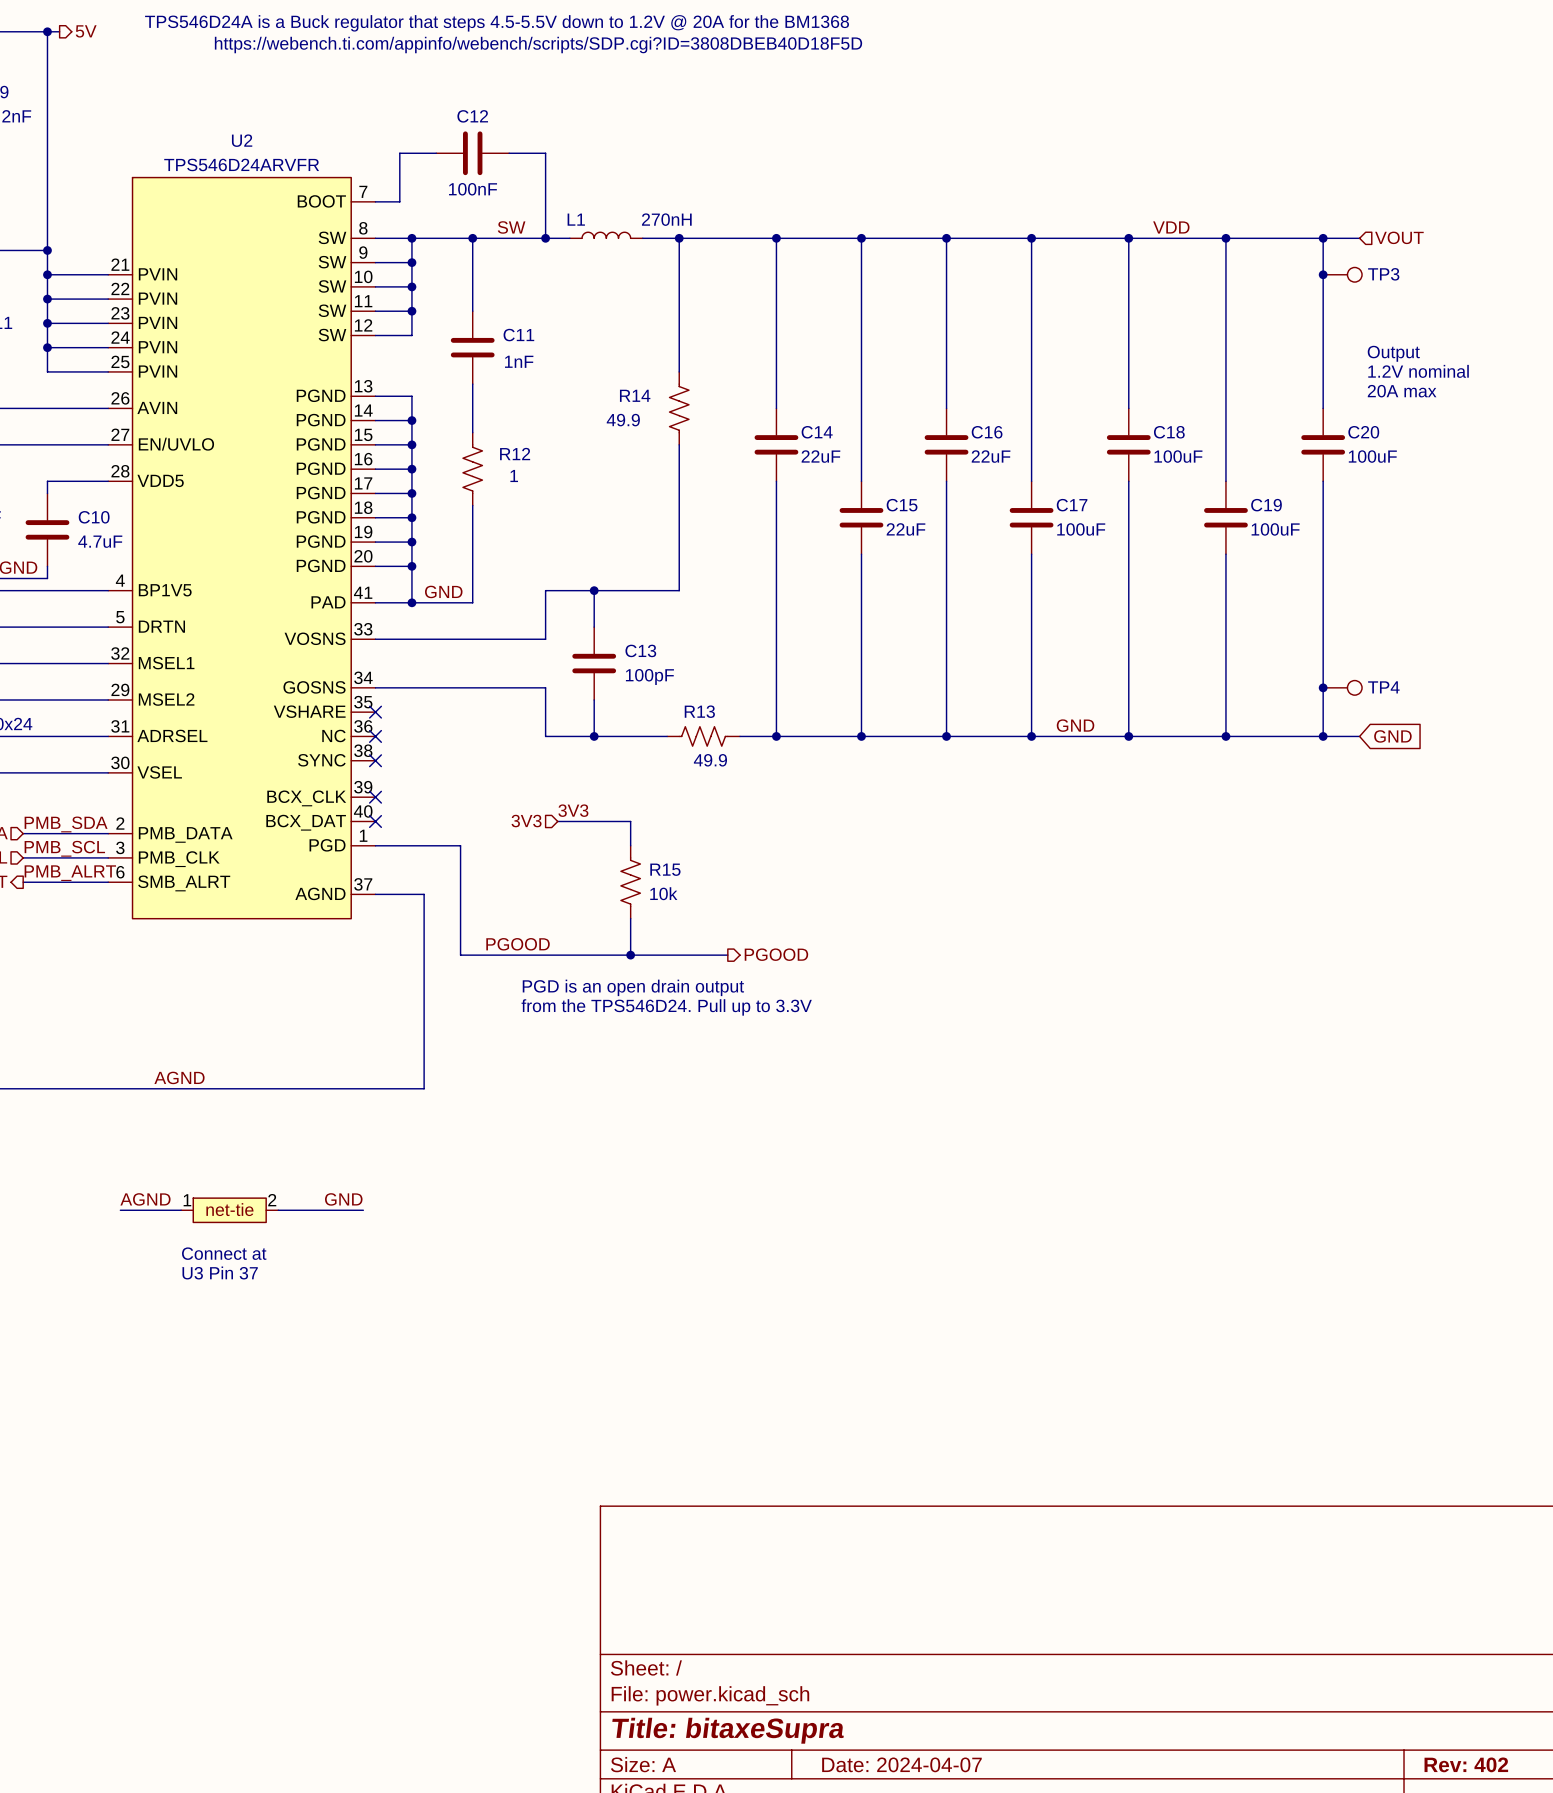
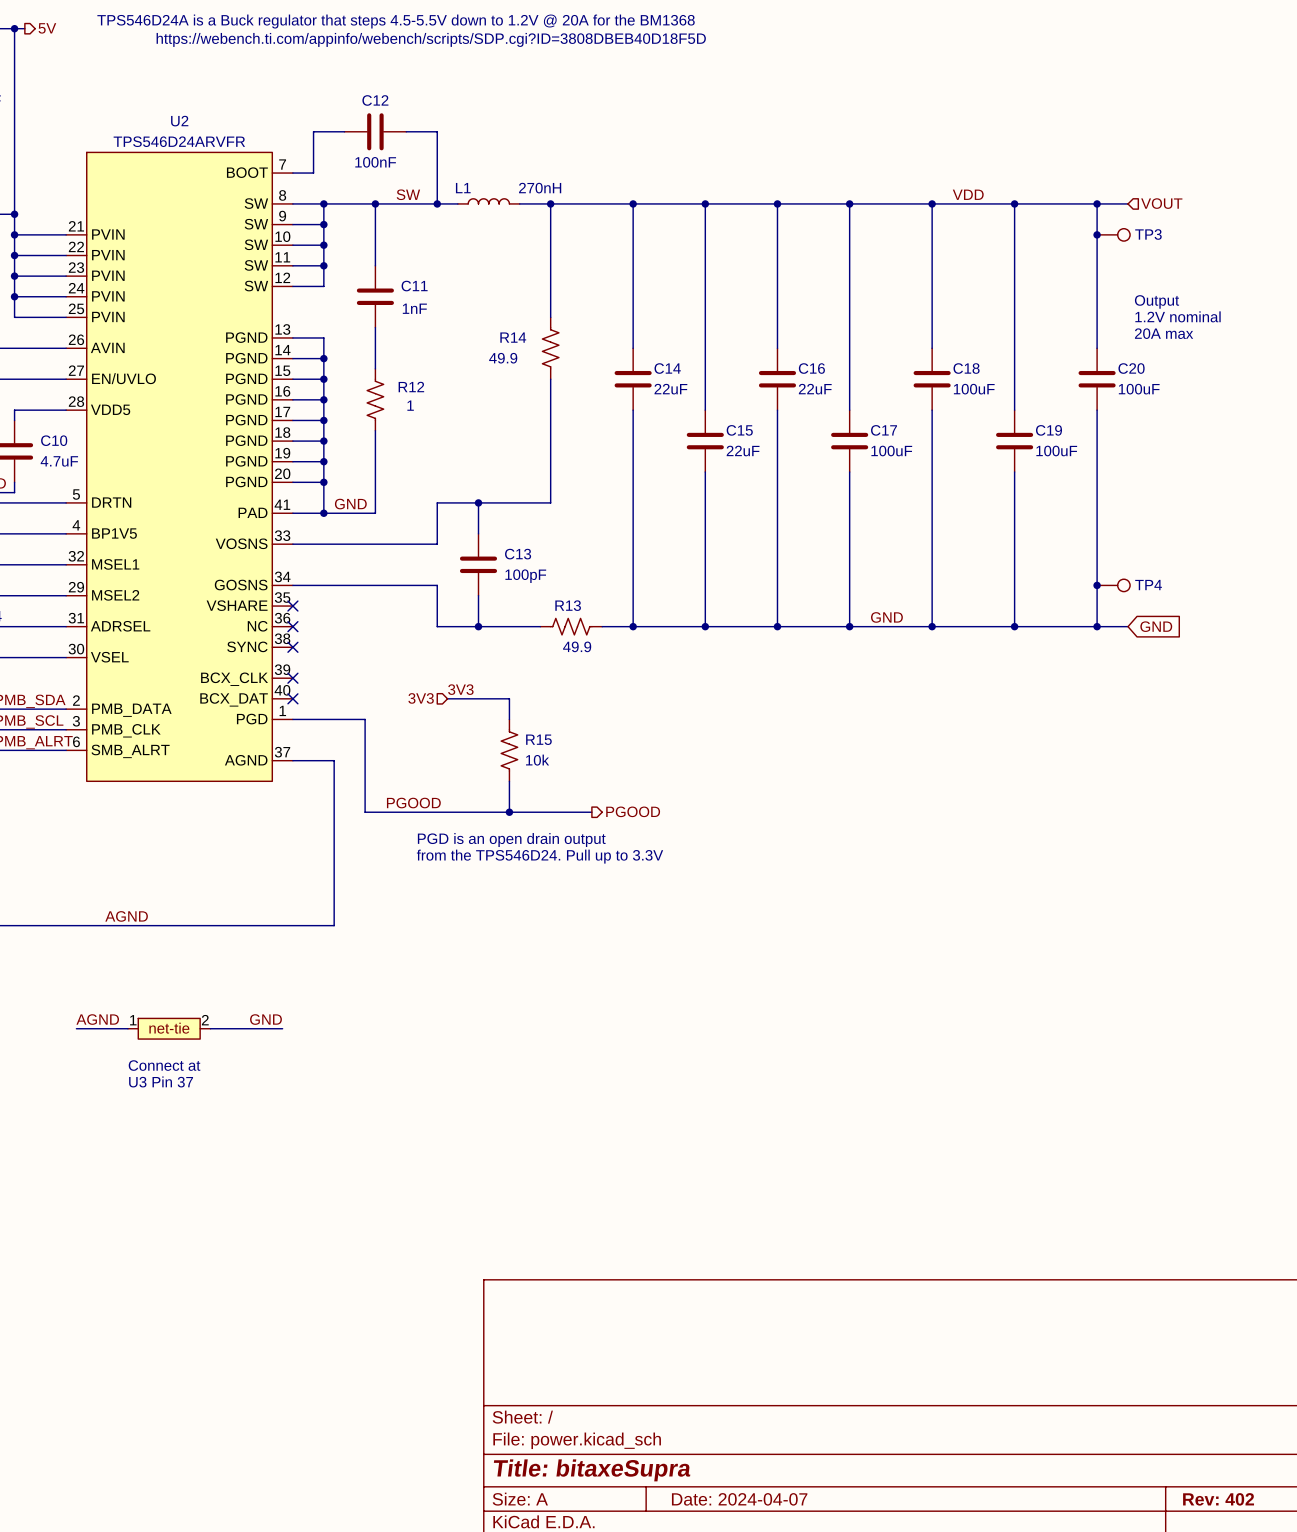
U2 pin number: 4 (120, 580) -> 5 (76, 494)
U2 pin name: BP1V5 (165, 590) -> DRTN (111, 502)
U2 pin number: 5 (120, 617) -> 4 (76, 525)
U2 pin name: DRTN (161, 626) -> BP1V5 (114, 533)

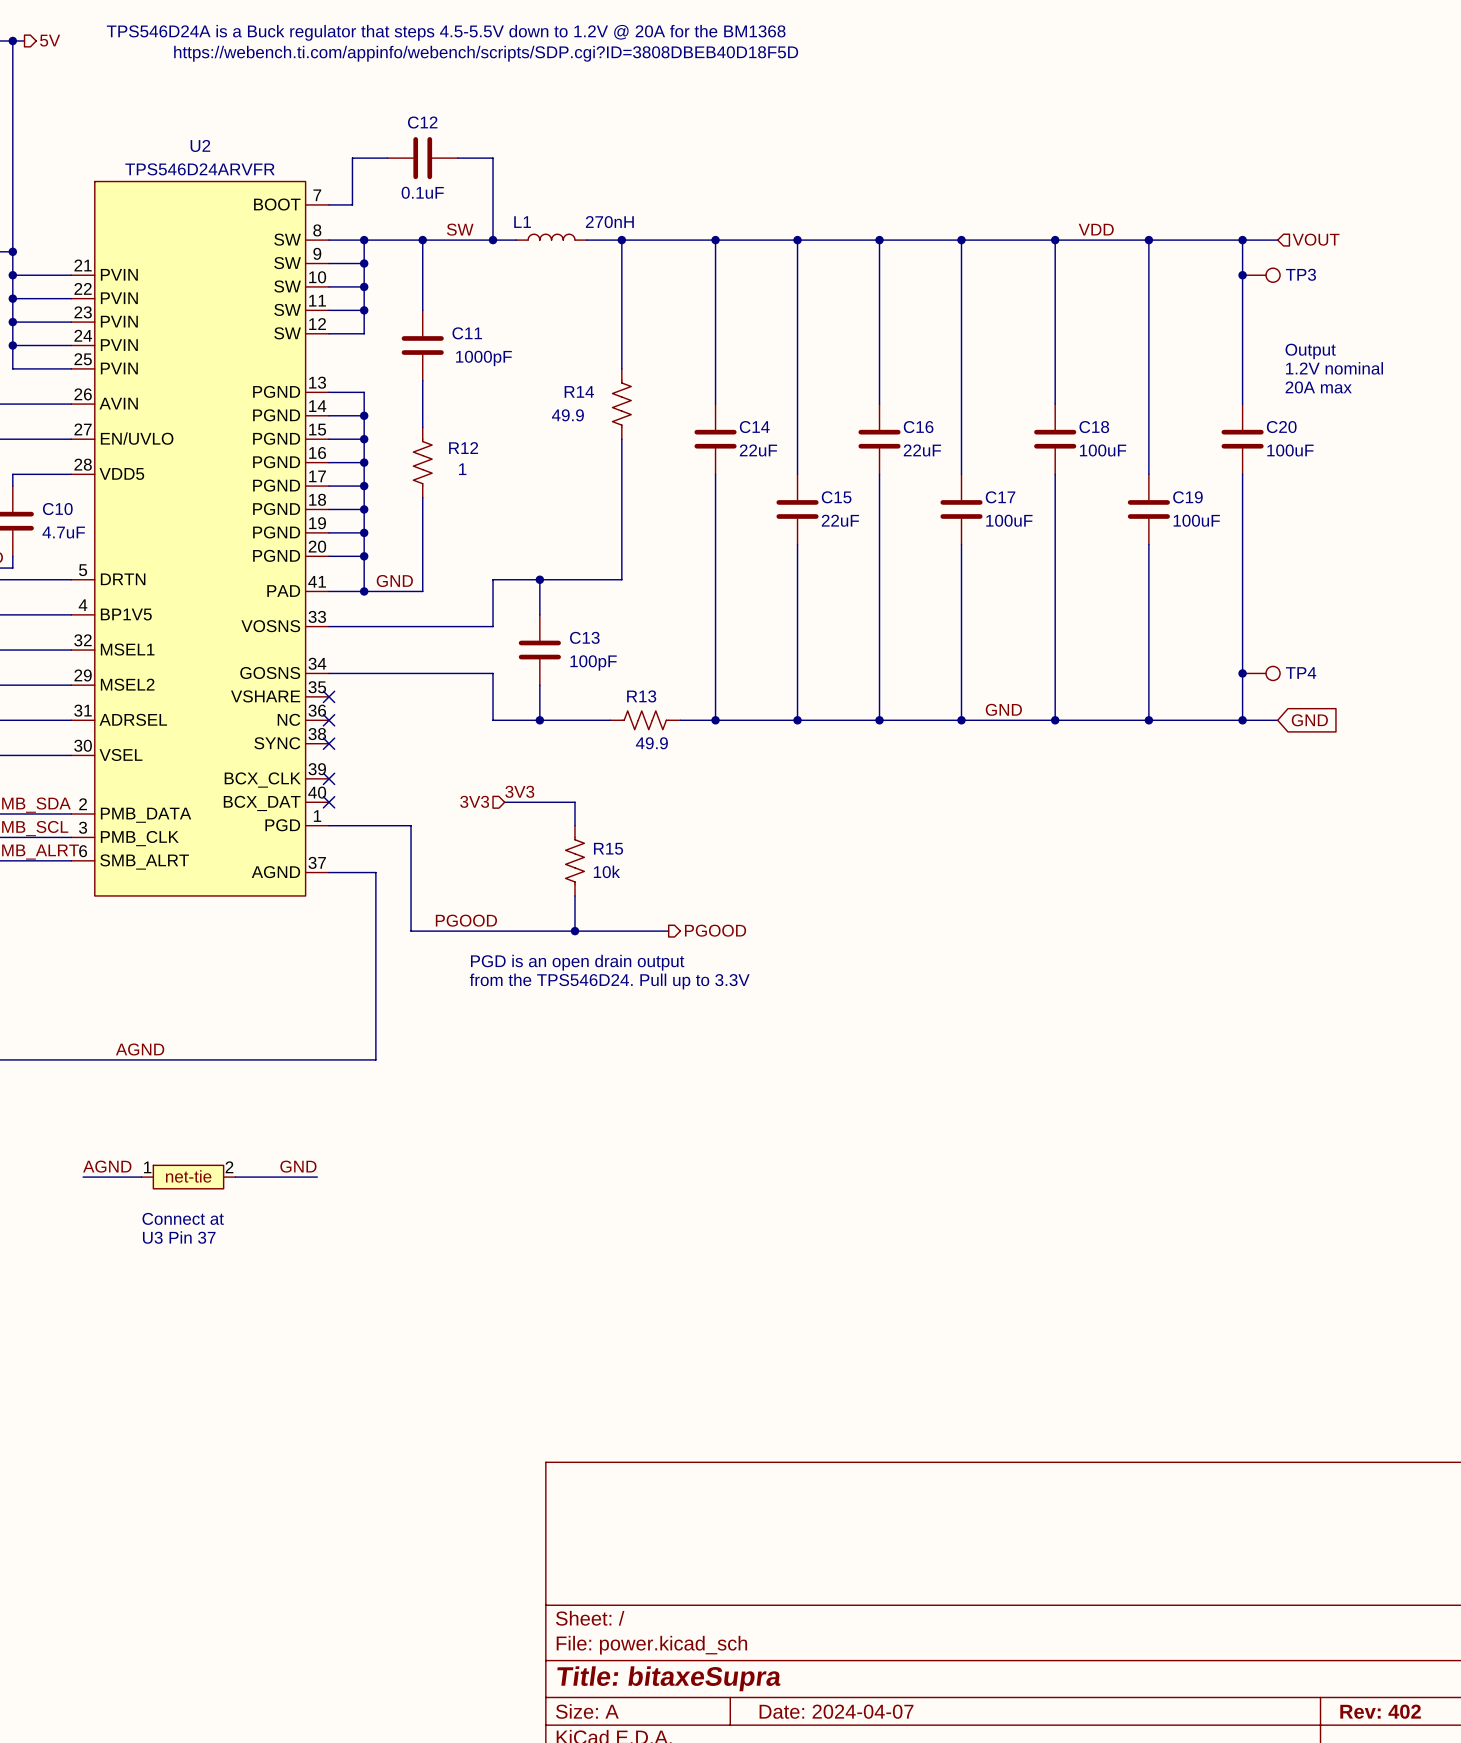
C12 value: 100nF (375, 162) -> 0.1uF (422, 192)
C11 value: 1nF (414, 308) -> 1000pF (483, 358)

